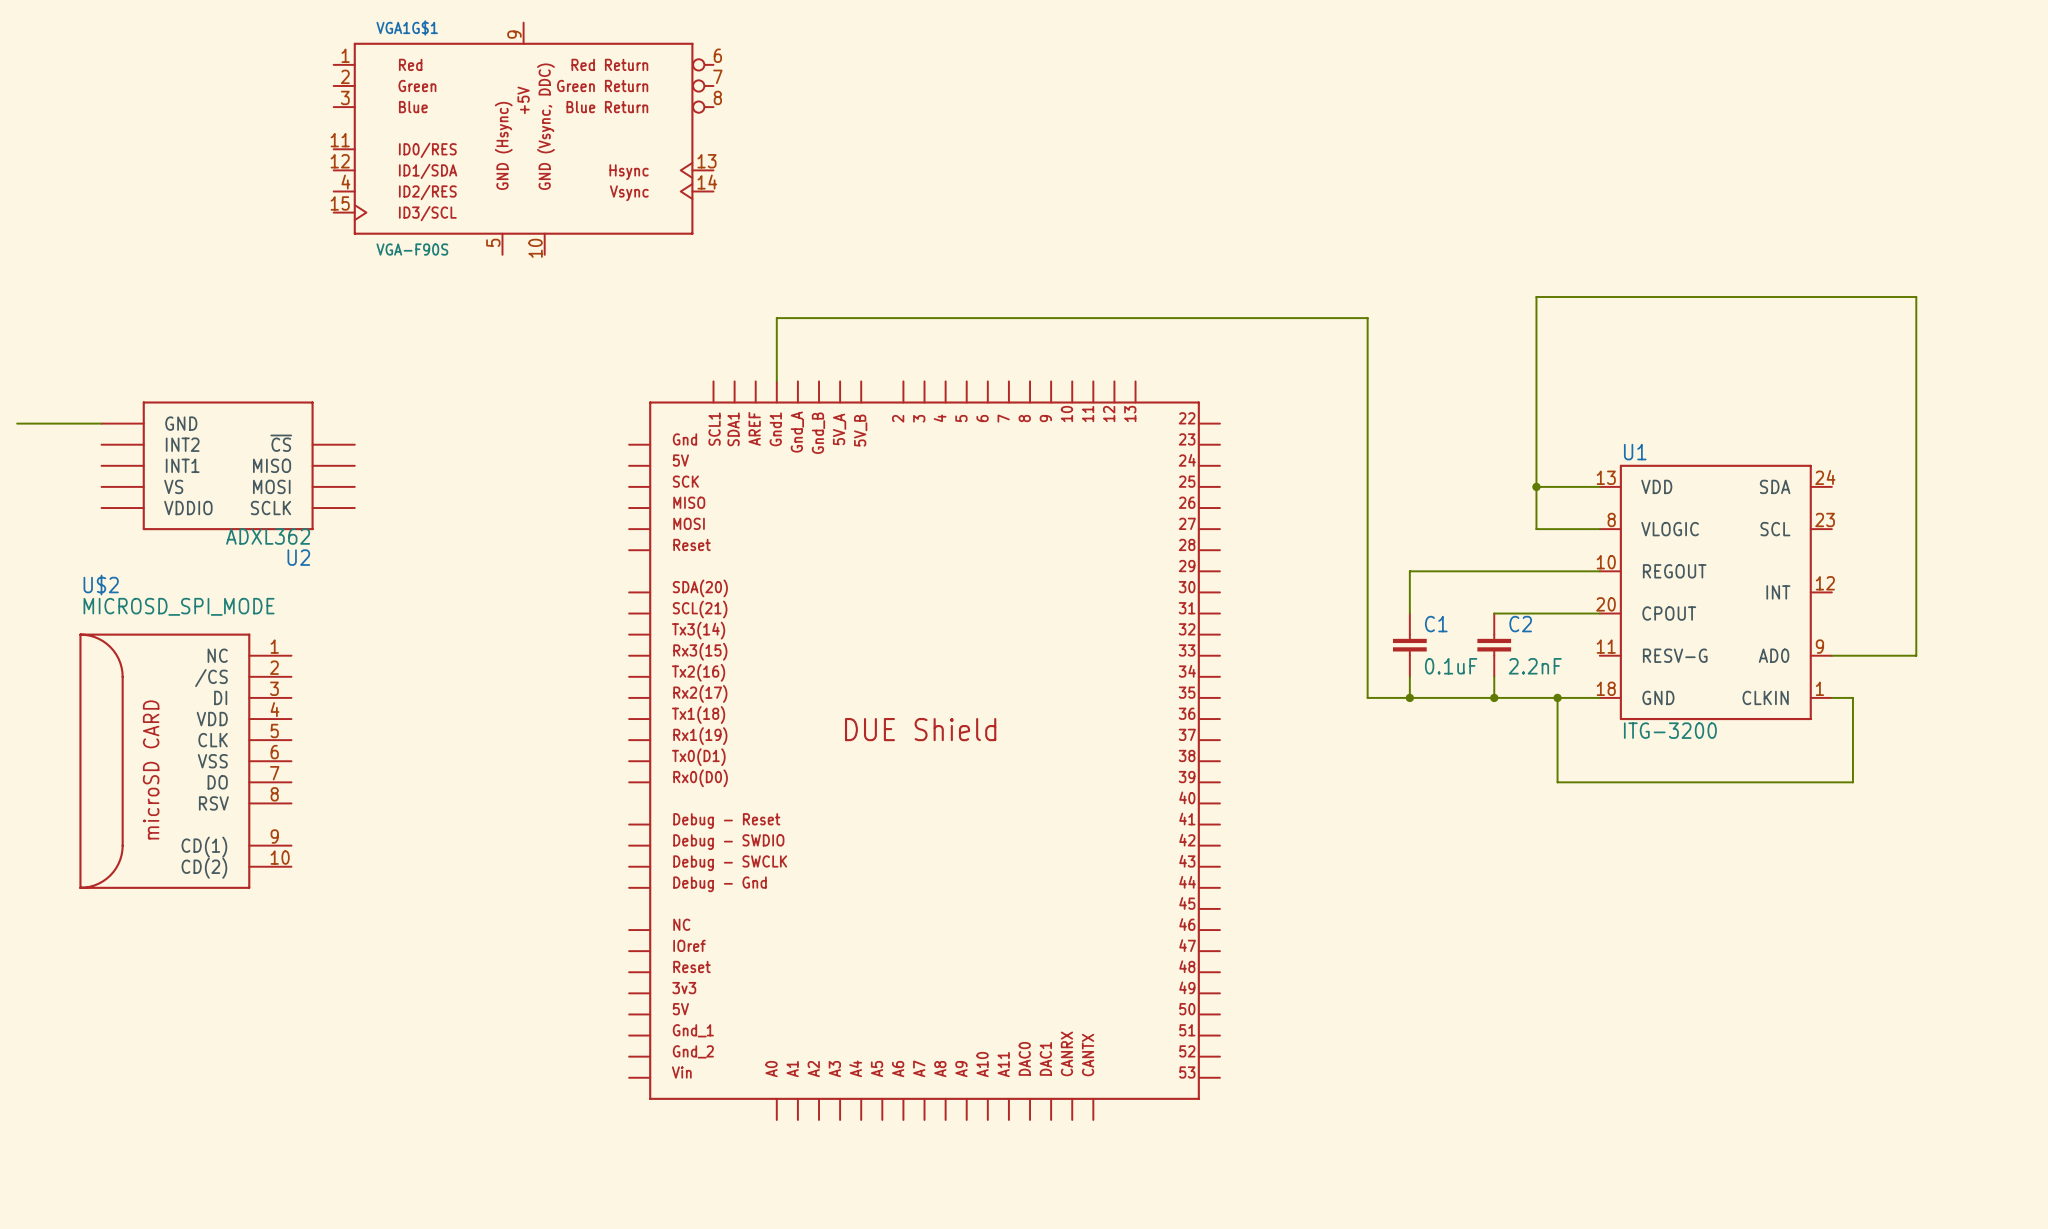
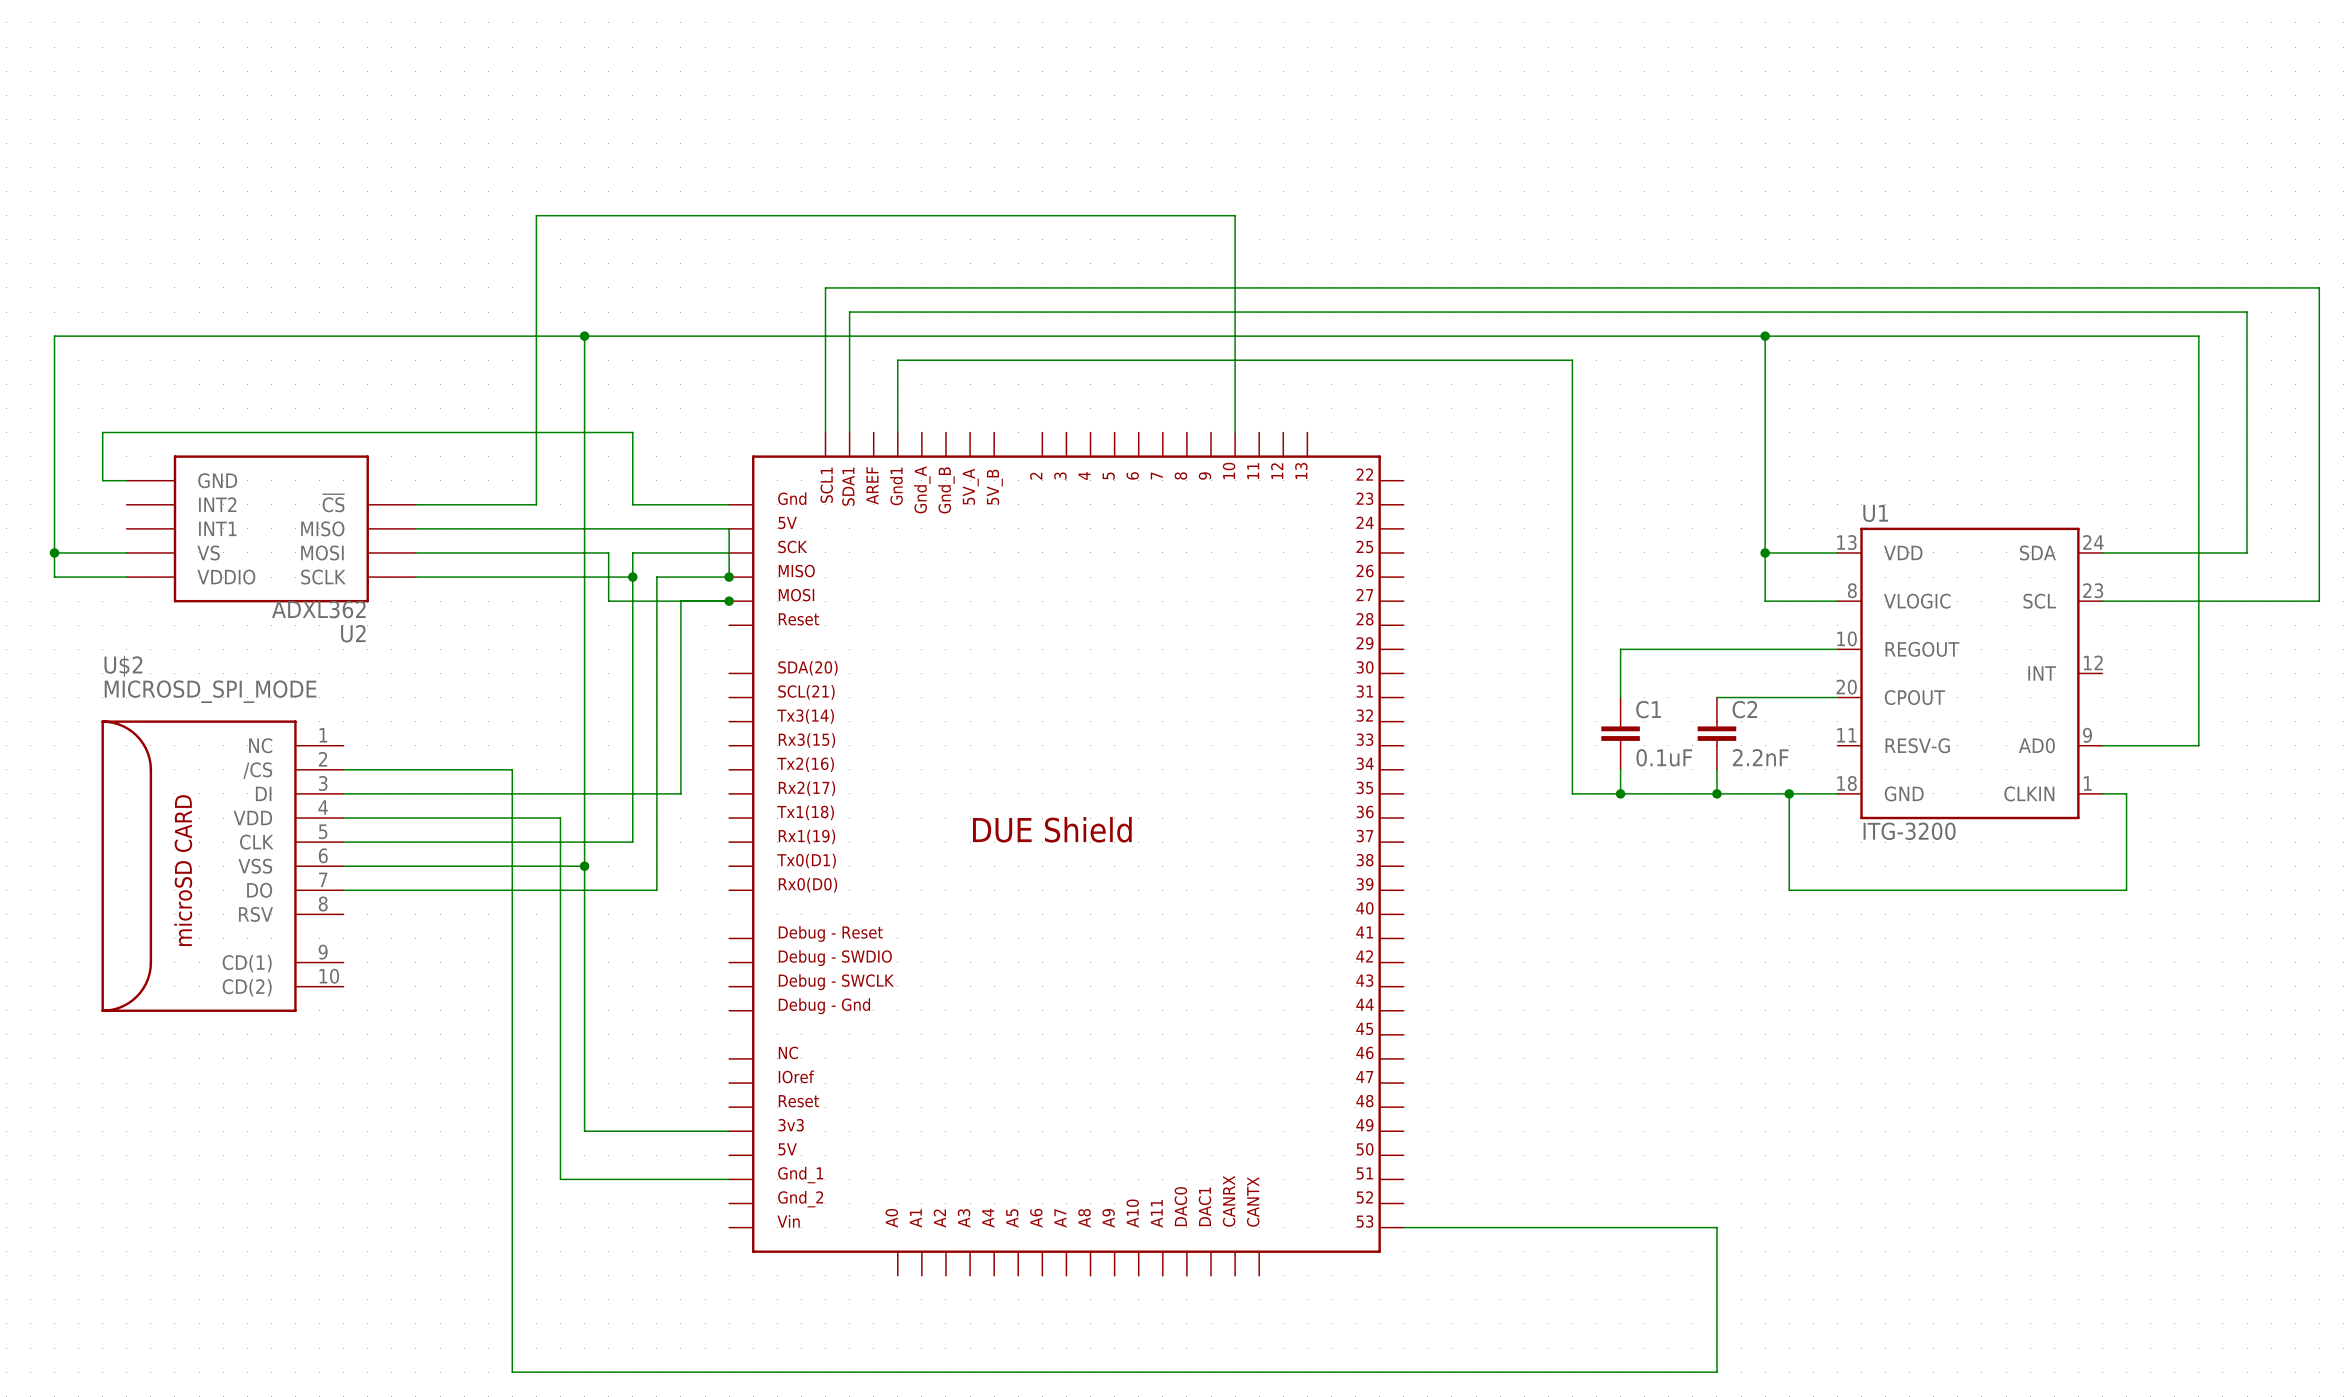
VGA1G$1: VGA-F90S (523, 138) -> none
wire: none -> (584, 336) (584, 1131) (729, 1131)
junction: none -> (584, 336)
wire: none -> (1765, 336) (54, 336) (54, 577) (126, 577)
junction: none -> (1765, 336)
wire: none -> (825, 432) (825, 287) (2319, 287) (2319, 601) (2102, 601)
wire: none -> (849, 432) (849, 312) (2247, 312) (2247, 552) (2102, 552)
wire: none -> (1235, 432) (1235, 215) (536, 215) (536, 504) (415, 504)
wire: (17, 423) (80, 423) -> (729, 504) (632, 504) (632, 432) (102, 432) (102, 480)
wire: none -> (415, 528) (729, 528) (729, 577) (656, 577) (656, 890) (343, 890)
wire: none -> (54, 552) (126, 552)
junction: none -> (54, 552)
wire: none -> (415, 552) (608, 552) (608, 601) (729, 601)
wire: none -> (729, 552) (632, 552) (632, 842) (343, 842)
wire: none -> (415, 577) (632, 577)
junction: none -> (632, 577)
junction: none -> (729, 577)
wire: none -> (680, 601) (680, 793) (343, 793)
junction: none -> (729, 601)
wire: none -> (343, 769) (512, 769) (512, 1372) (1716, 1372) (1716, 1227) (1403, 1227)
wire: none -> (343, 818) (560, 818) (560, 1179) (729, 1179)
wire: none -> (343, 866) (584, 866)
junction: none -> (584, 866)

